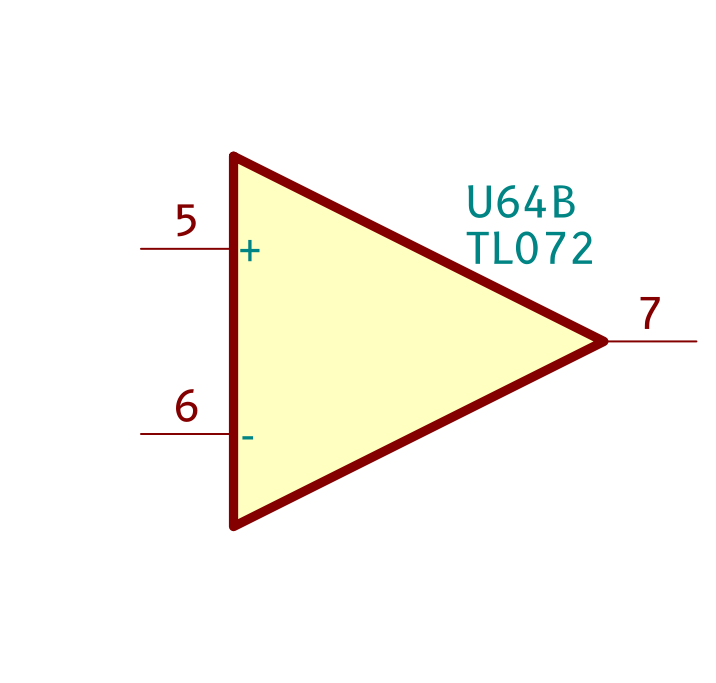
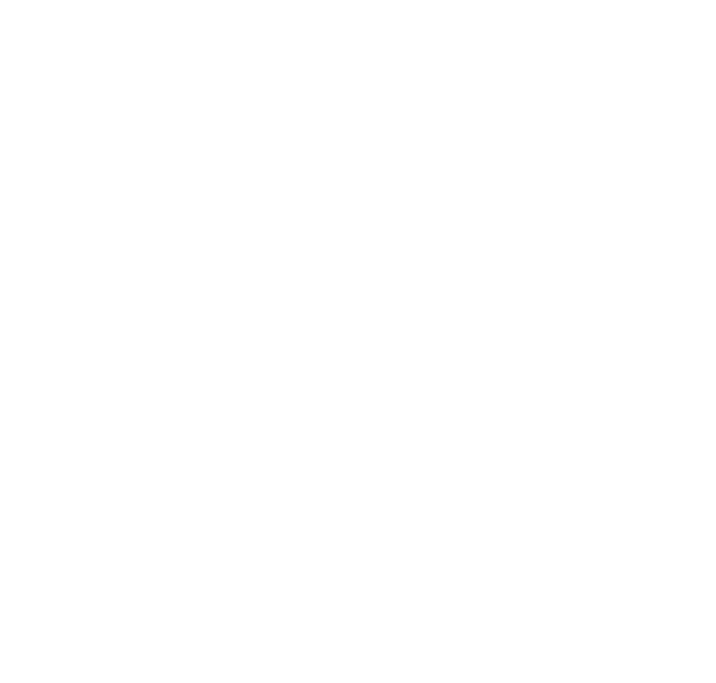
U64B: TL072 (418, 341) -> none

